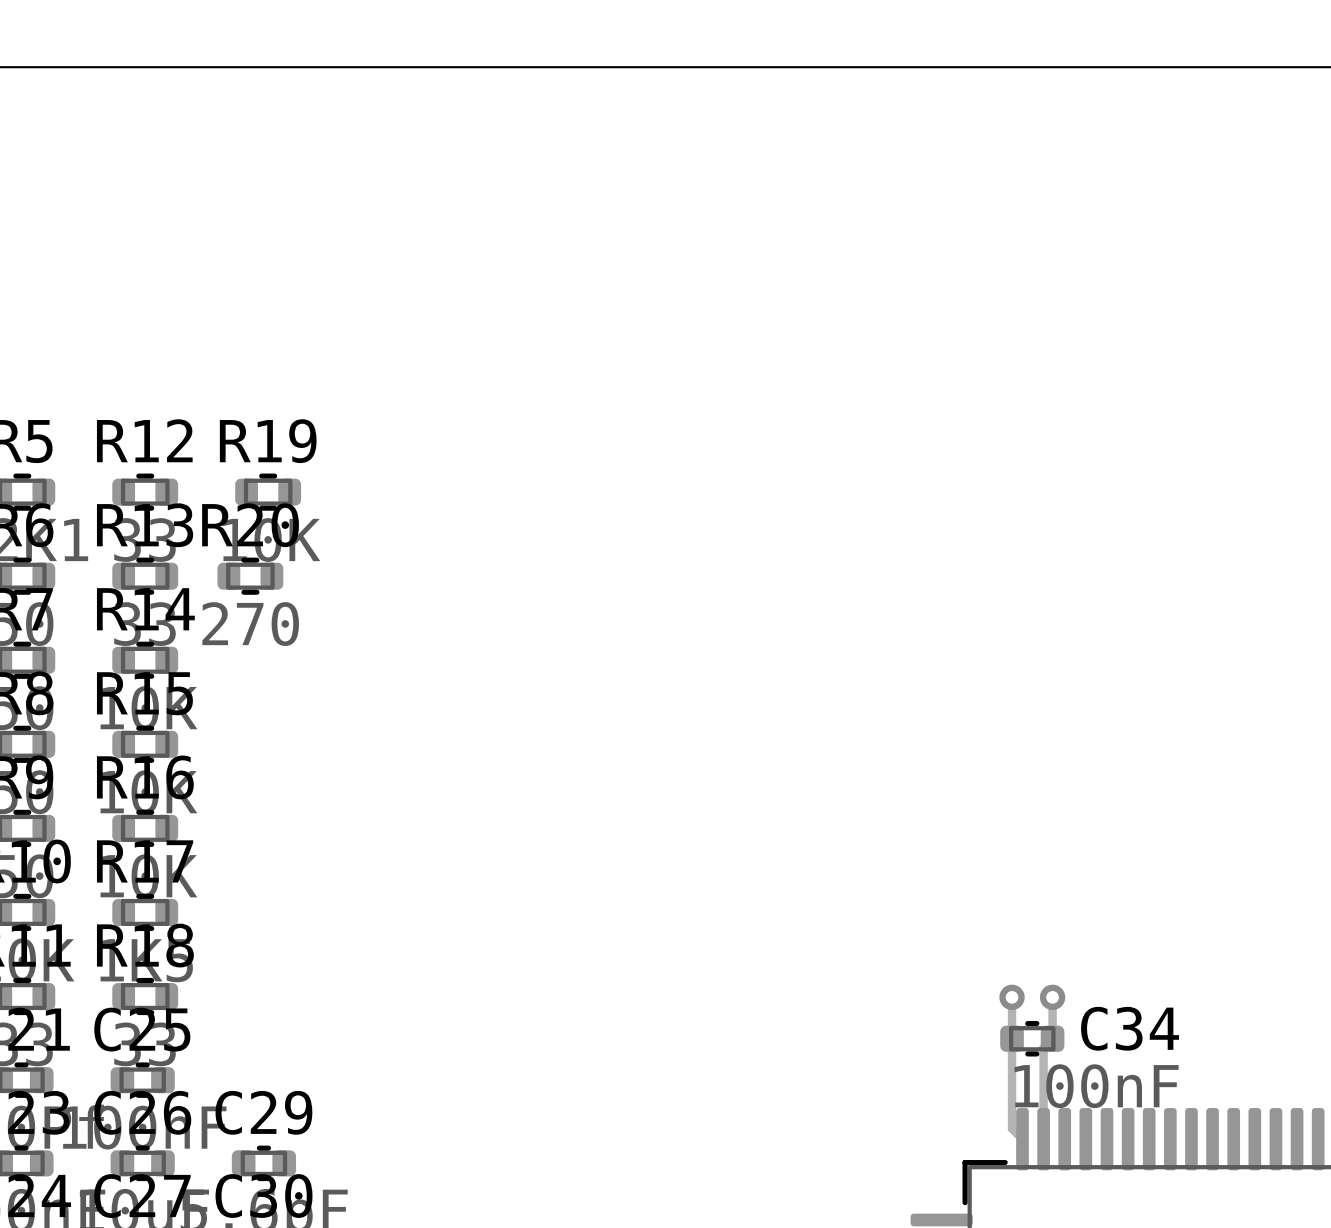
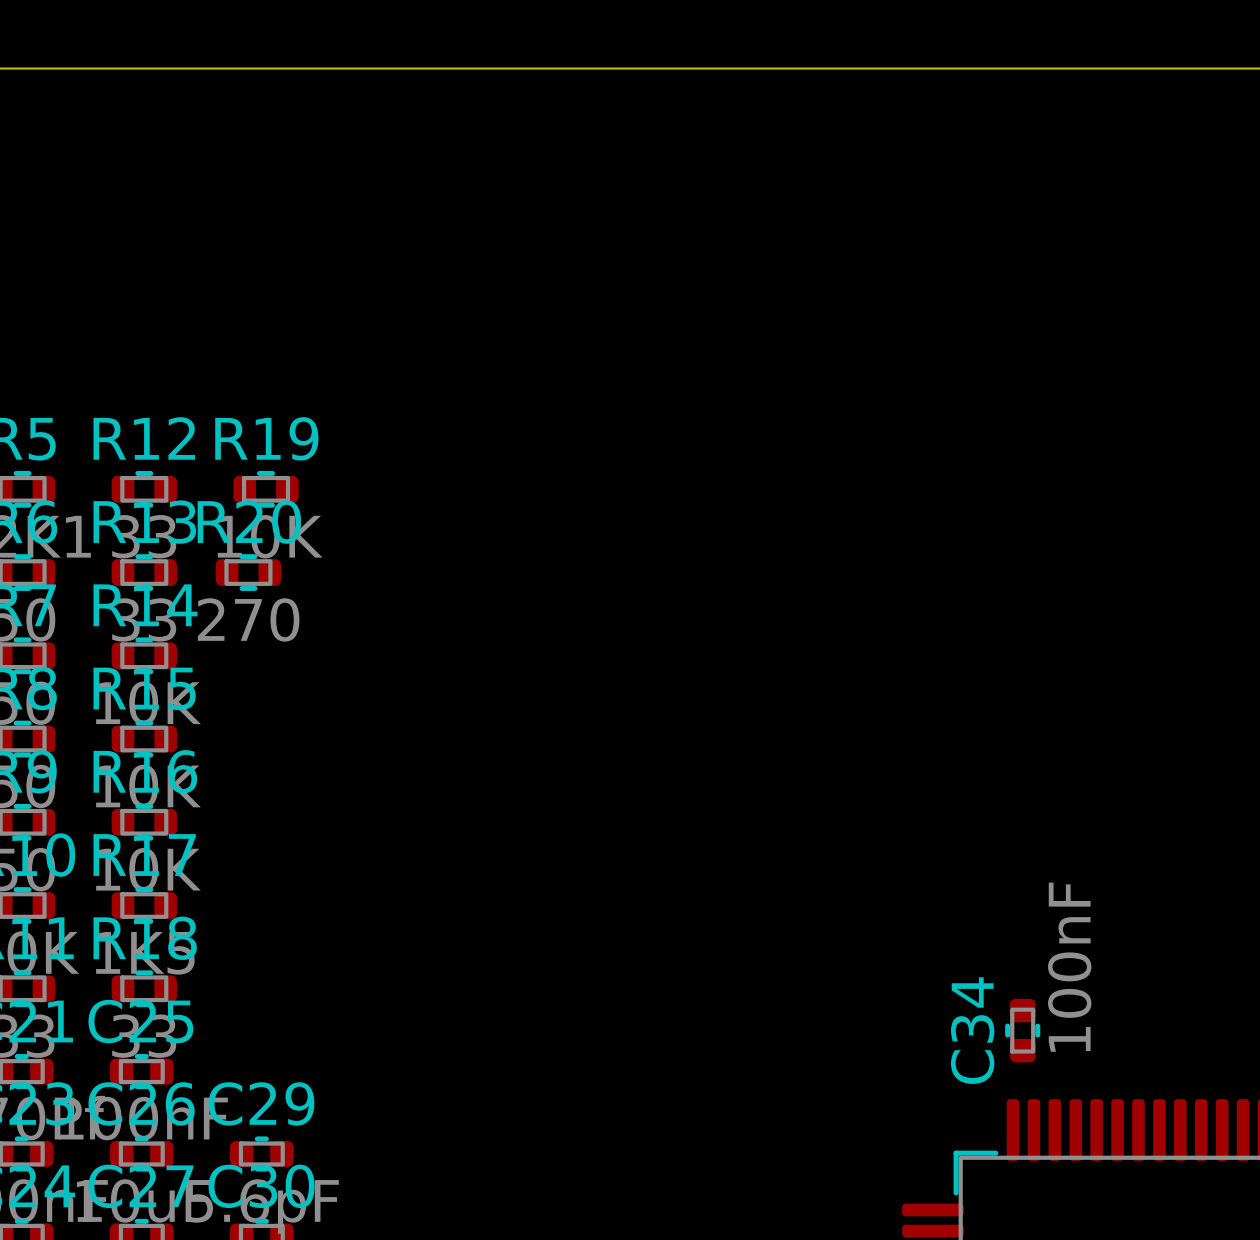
track: (1012, 997) (1012, 1128) (1022, 1139) -> none
via: (1012, 997) -> none
track: (1052, 997) (1052, 1038) (1043, 1047) (1043, 1139) -> none
via: (1052, 997) -> none
C34 name position: C34 (1130, 1028) -> C34 (972, 1030)
C34 rotation: 0° (1032, 1038) -> 90° clockwise (1022, 1030)
C34 value position: 100nF (1096, 1086) -> 100nF (1069, 967)

